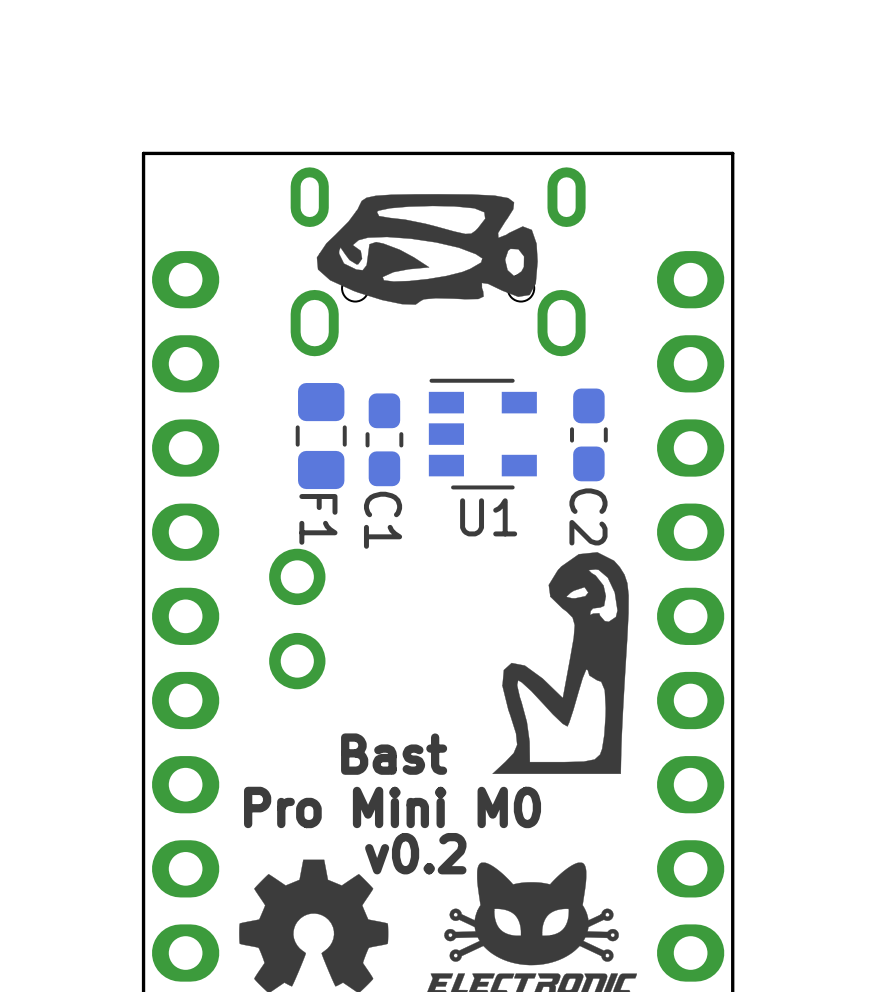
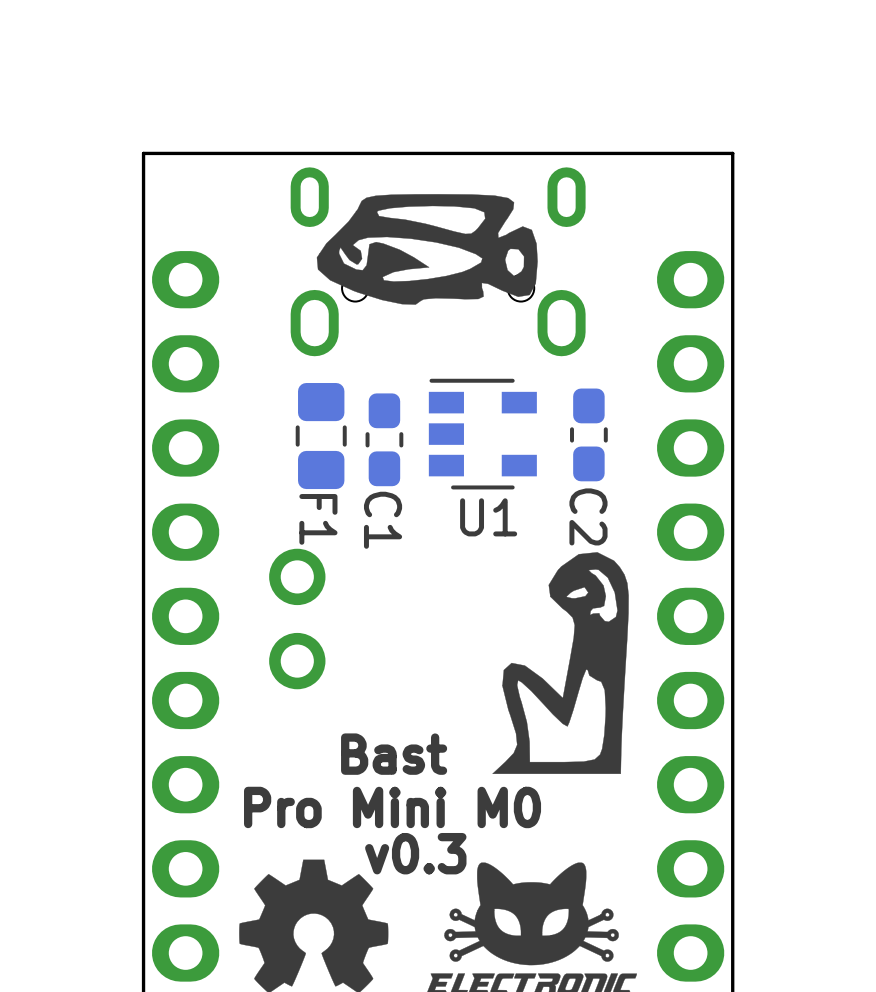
text: v0.2 (415, 853) -> v0.3 (415, 853)

